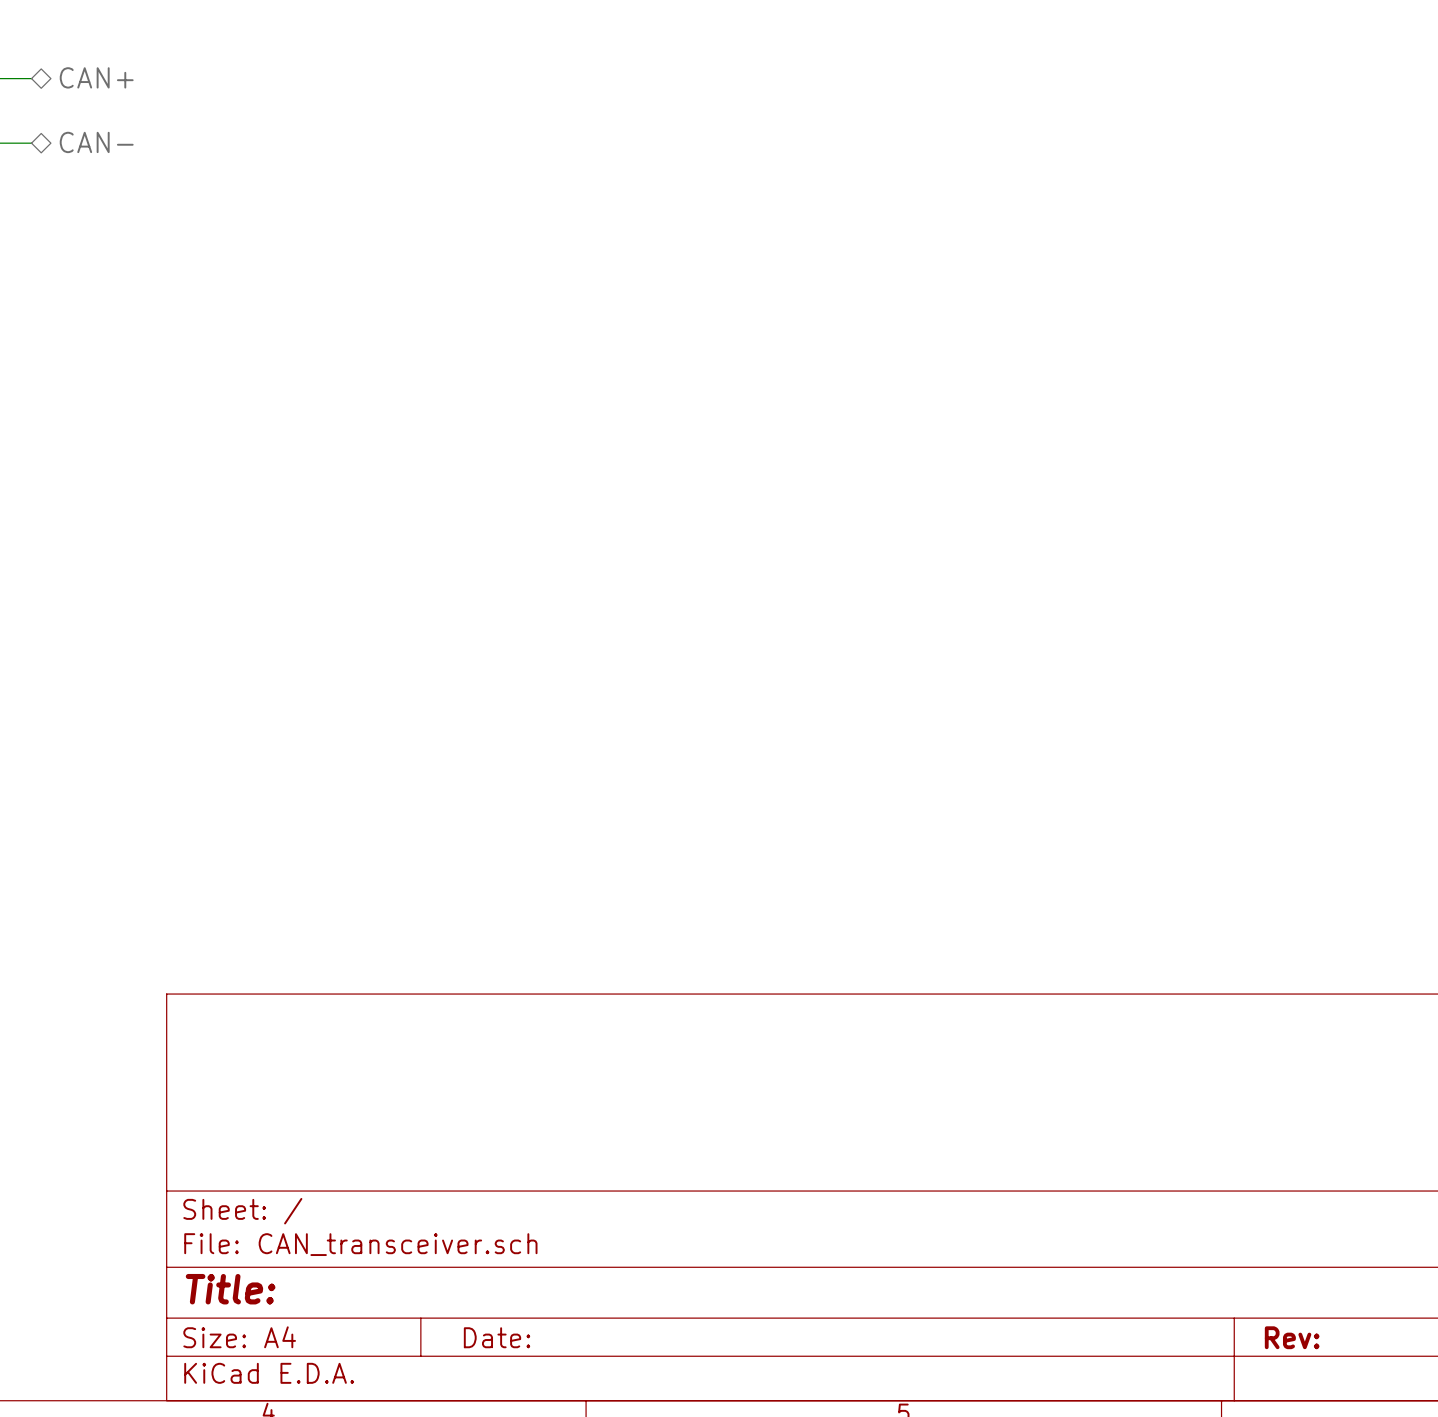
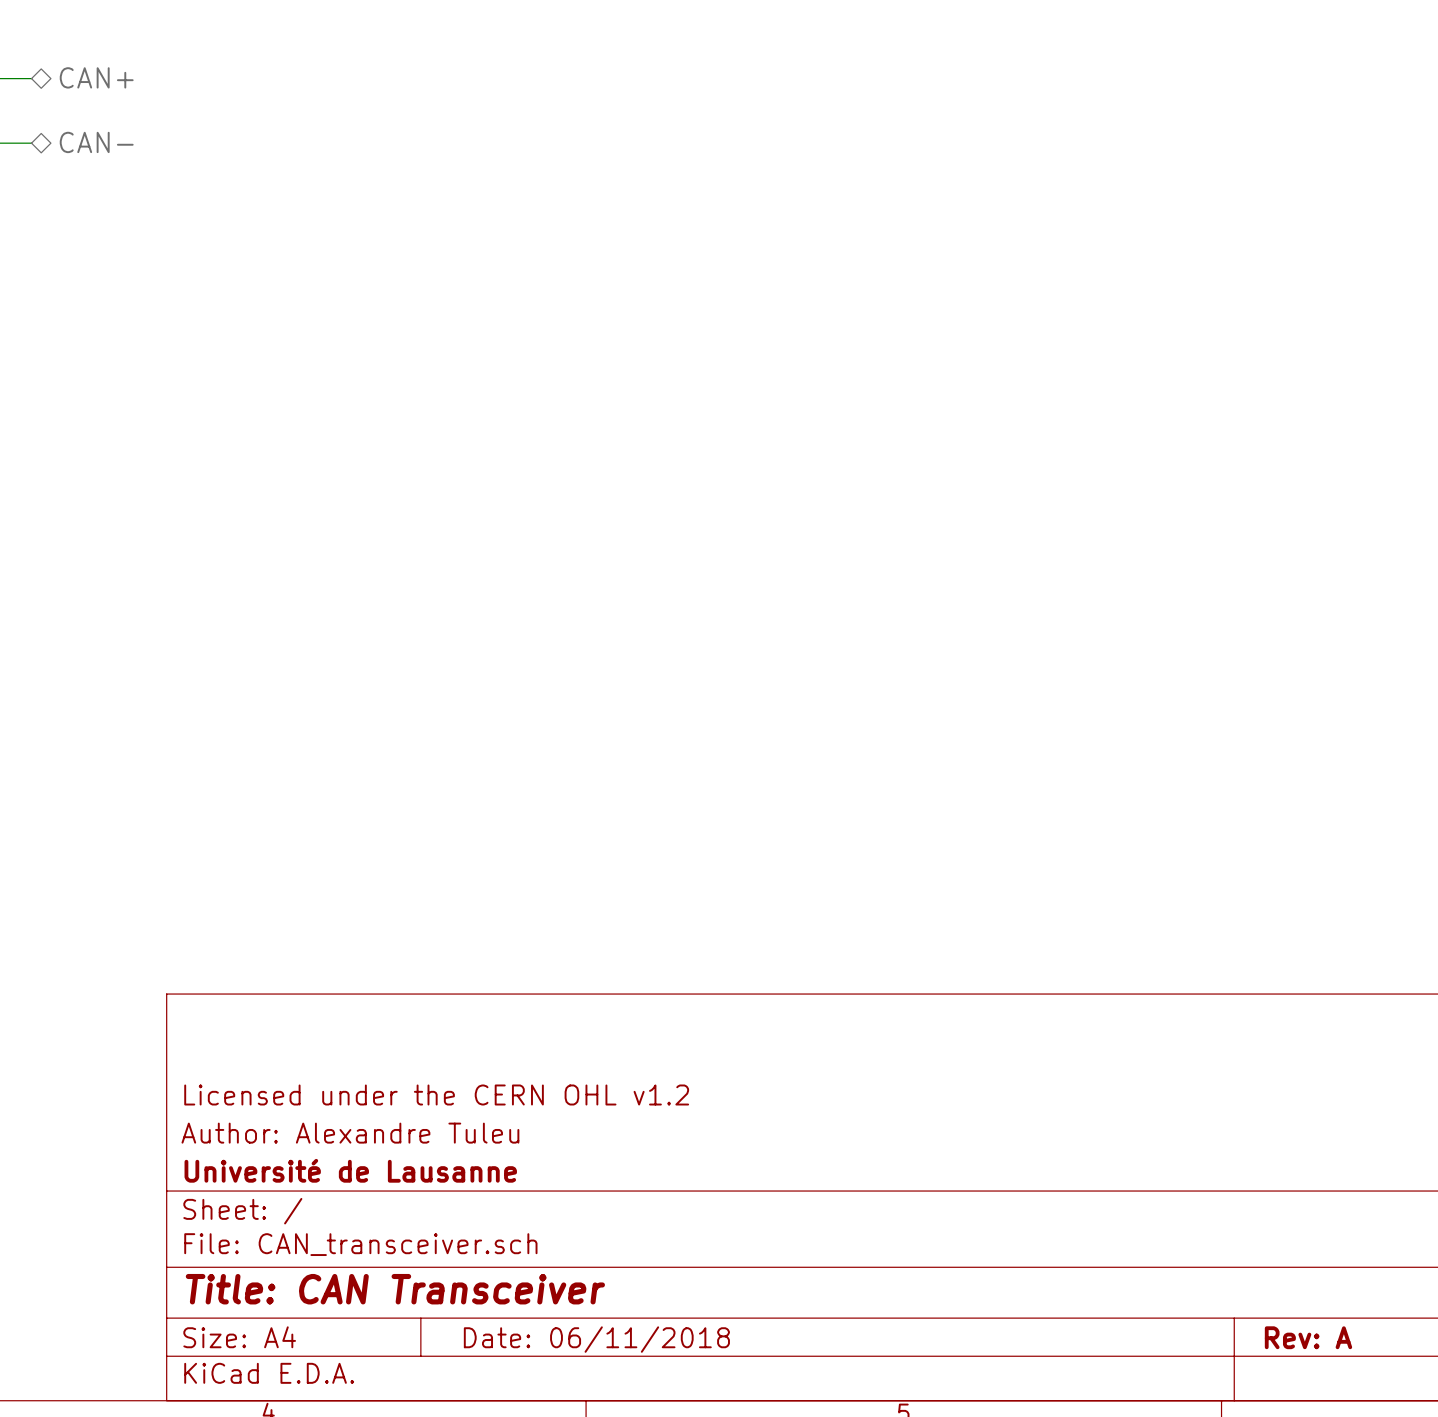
title block: none -> Licensed under the CERN OHL v1.2 (436, 1094)
title block: none -> Author: Alexandre Tuleu (350, 1133)
title block: none -> Université de Lausanne (350, 1170)
title block: Title: (230, 1289) -> Title: CAN Transceiver (395, 1289)
title block: Date: (497, 1337) -> Date: 06/11/2018 (596, 1339)
title block: Rev: (1292, 1337) -> Rev: A (1308, 1337)

